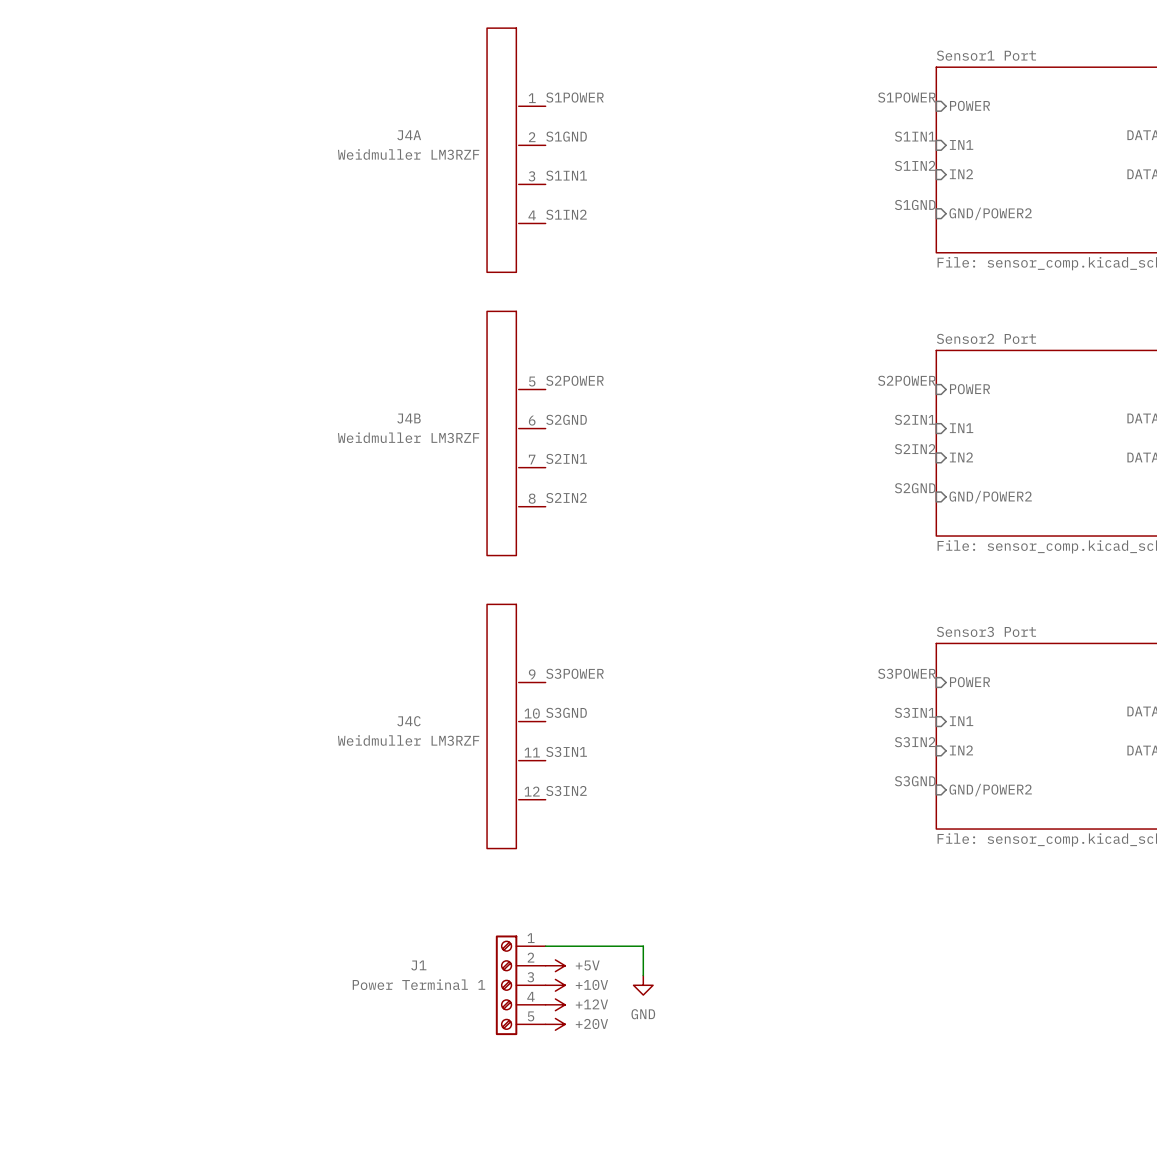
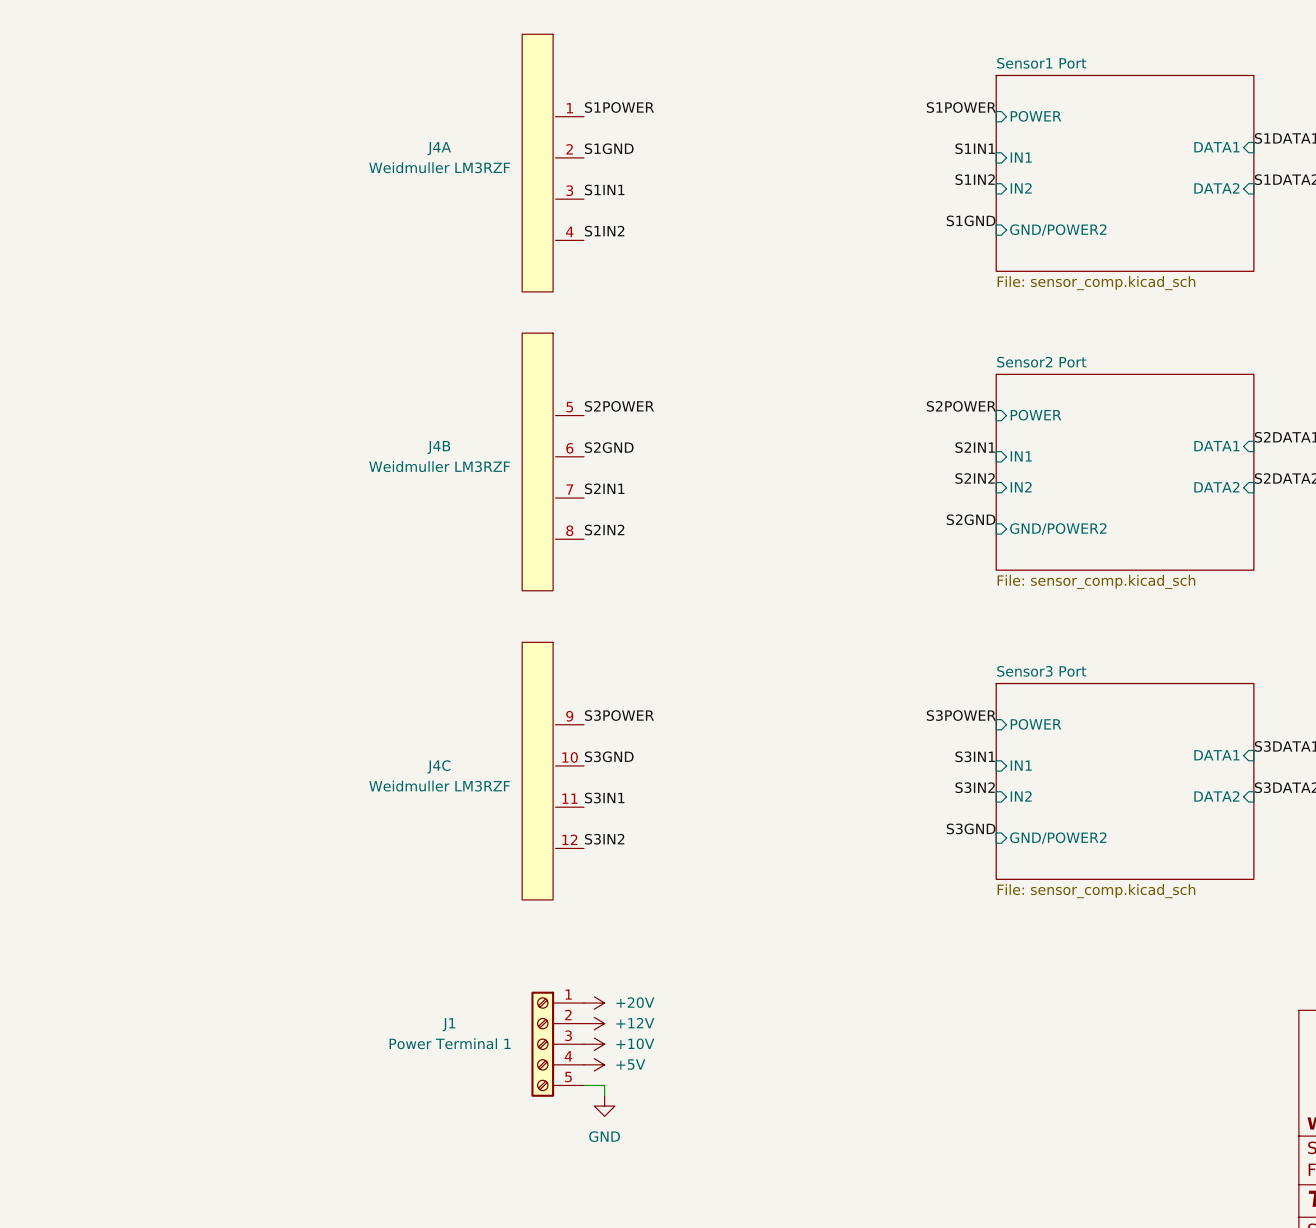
wire: (545, 946) (643, 946) (643, 975) -> none
power symbol: +5V (555, 965) -> +12V (594, 1023)
power symbol position: GND (643, 985) -> GND (604, 1106)
power symbol: +12V (555, 1004) -> +5V (594, 1064)
power symbol position: +20V (555, 1024) -> +20V (594, 1003)

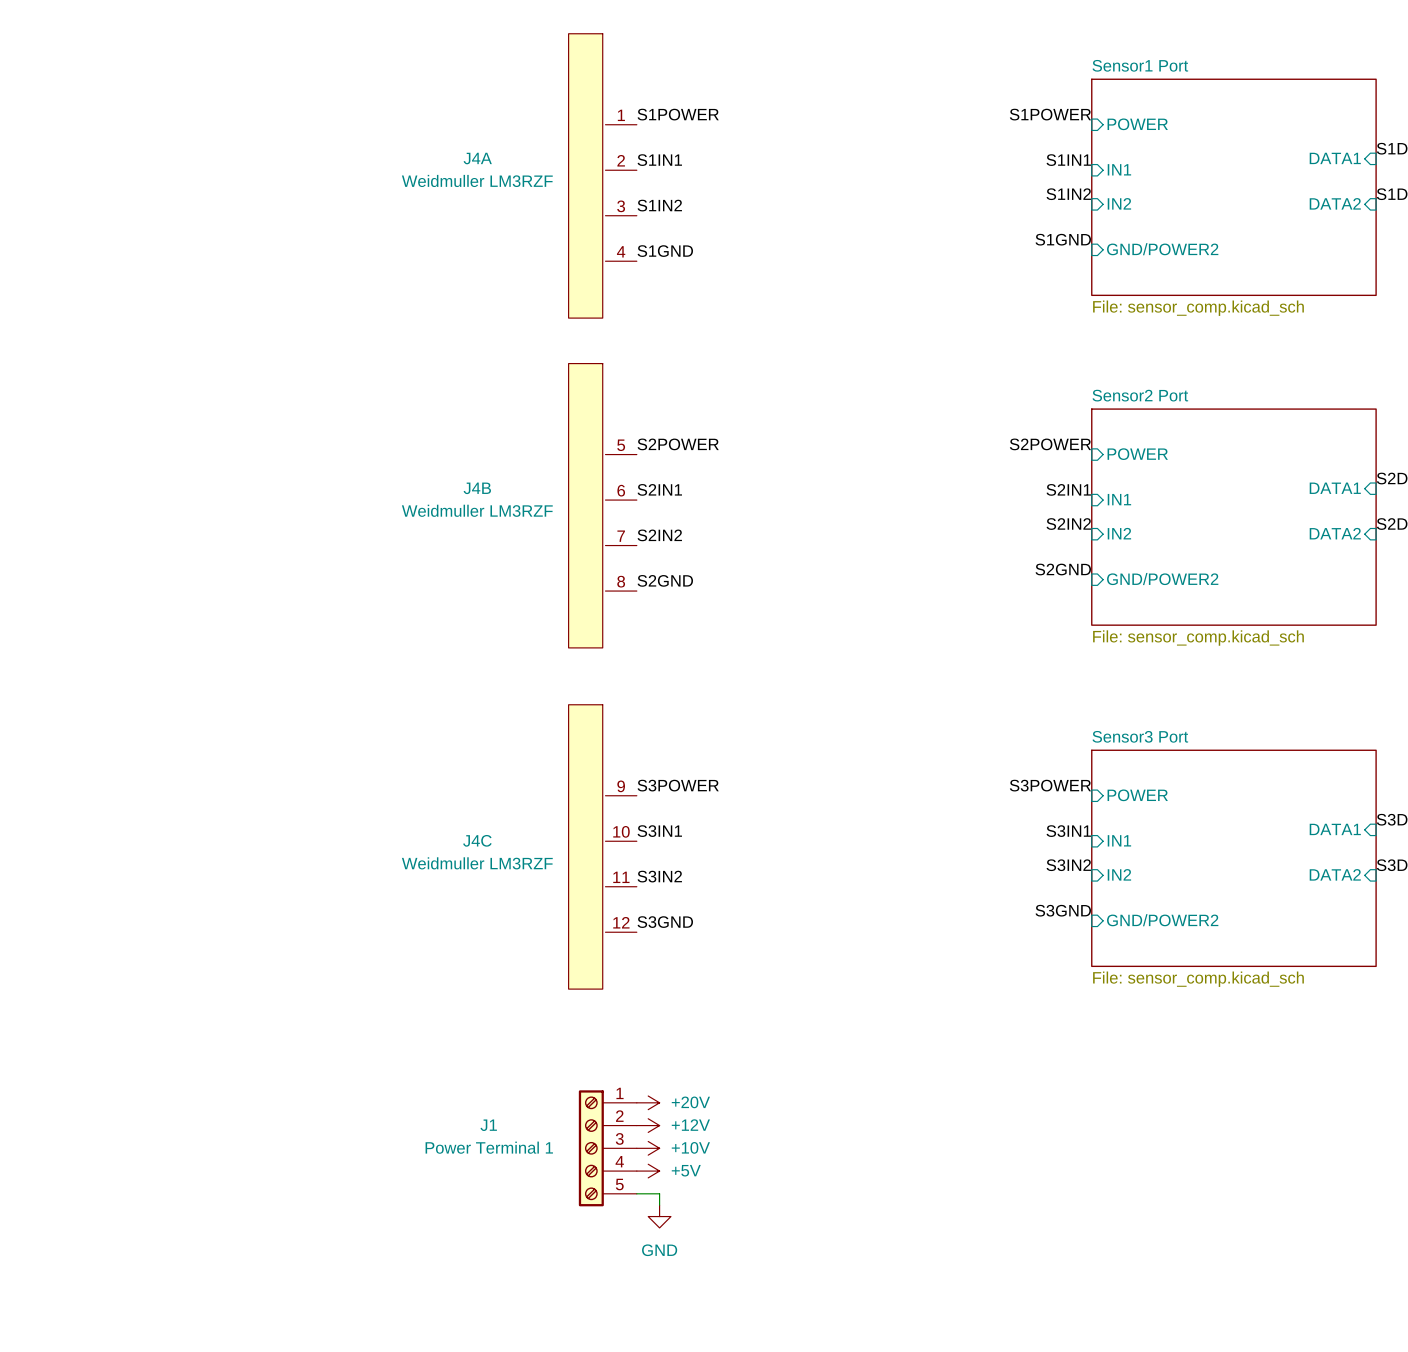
label: S1GND (609, 148) -> S1IN1 (659, 160)
label: S1IN1 (604, 189) -> S1IN2 (659, 205)
label: S1IN2 (604, 231) -> S1GND (665, 251)
label: S2GND (609, 447) -> S2IN1 (659, 489)
label: S2IN1 (604, 488) -> S2IN2 (659, 535)
label: S2IN2 (604, 530) -> S2GND (665, 580)
label: S3GND (609, 756) -> S3IN1 (659, 831)
label: S3IN1 (604, 798) -> S3IN2 (659, 876)
label: S3IN2 (604, 839) -> S3GND (665, 922)

